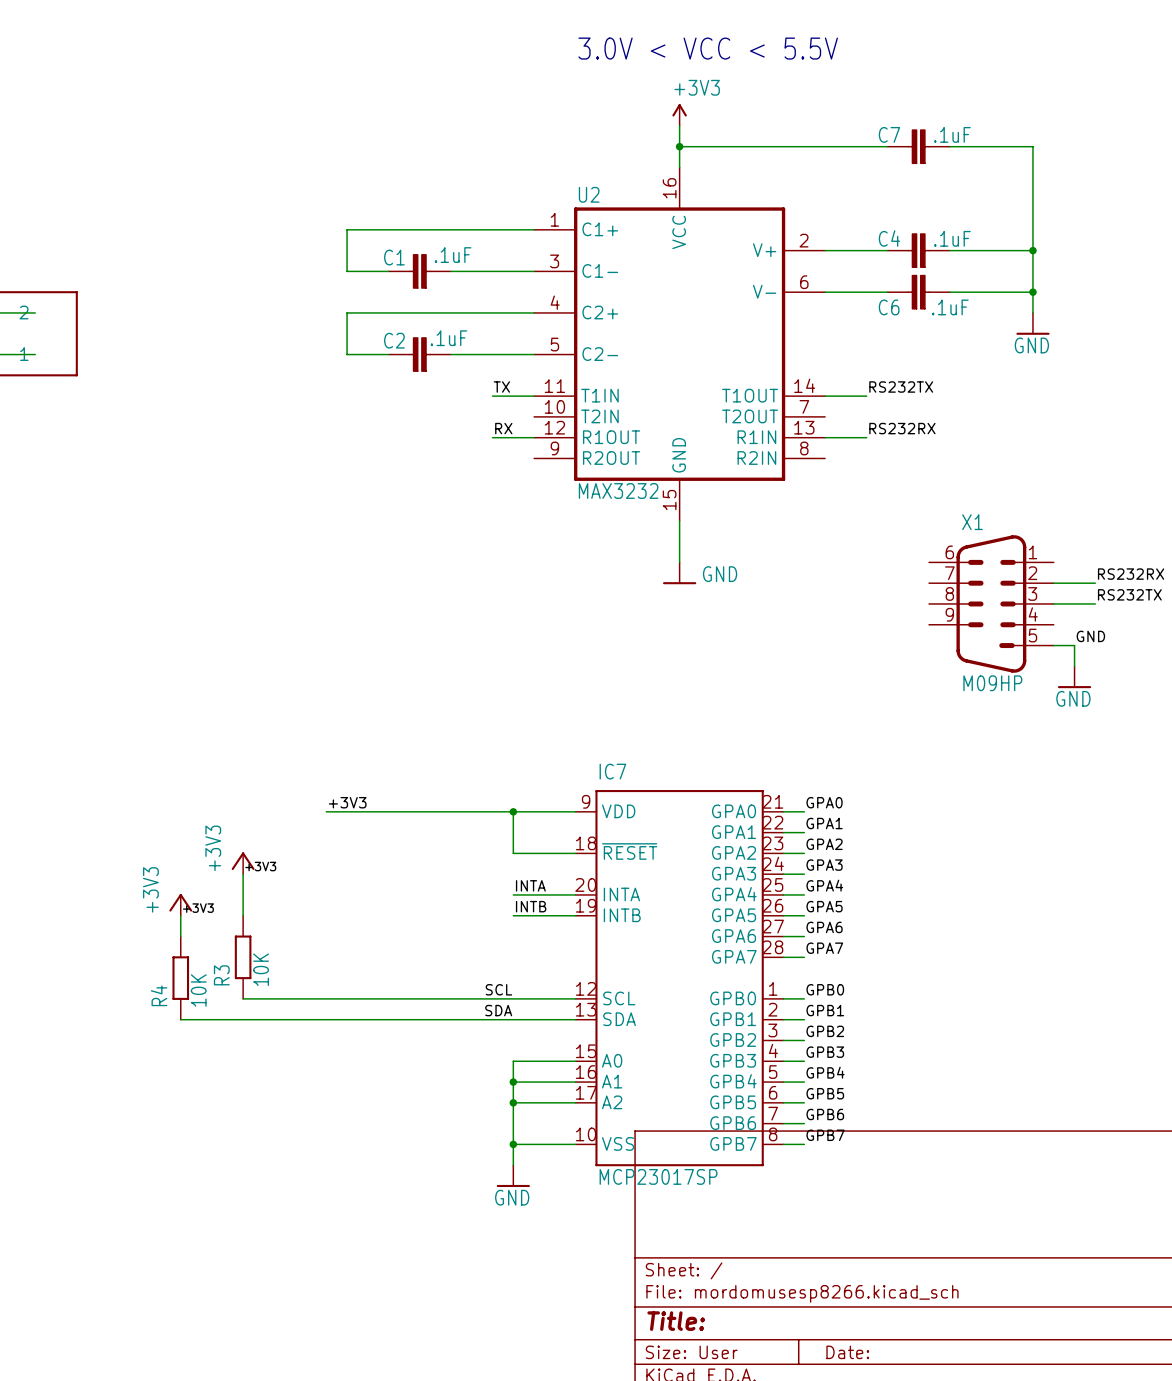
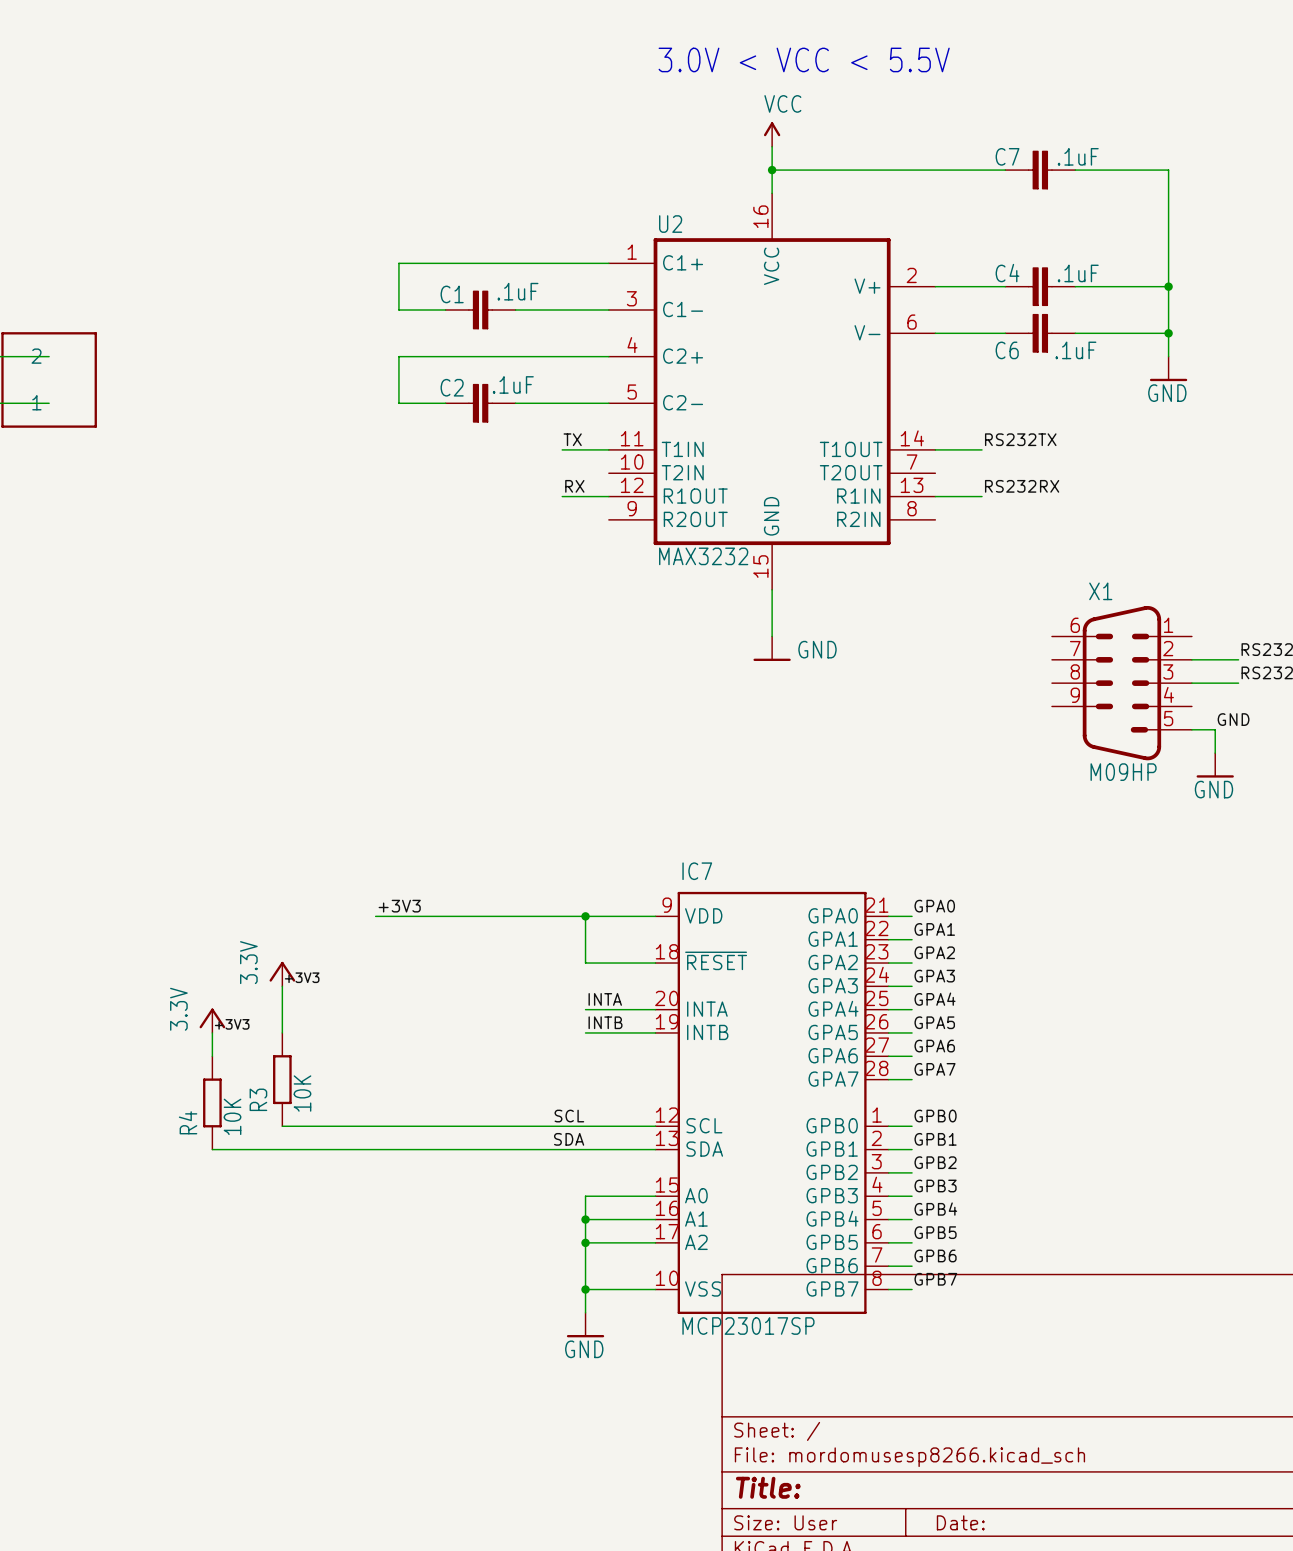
power symbol: +3V3 (679, 114) -> VCC (772, 134)
power symbol: +3V3 (243, 863) -> 3.3V (282, 974)
power symbol: +3V3 (180, 904) -> 3.3V (212, 1020)

